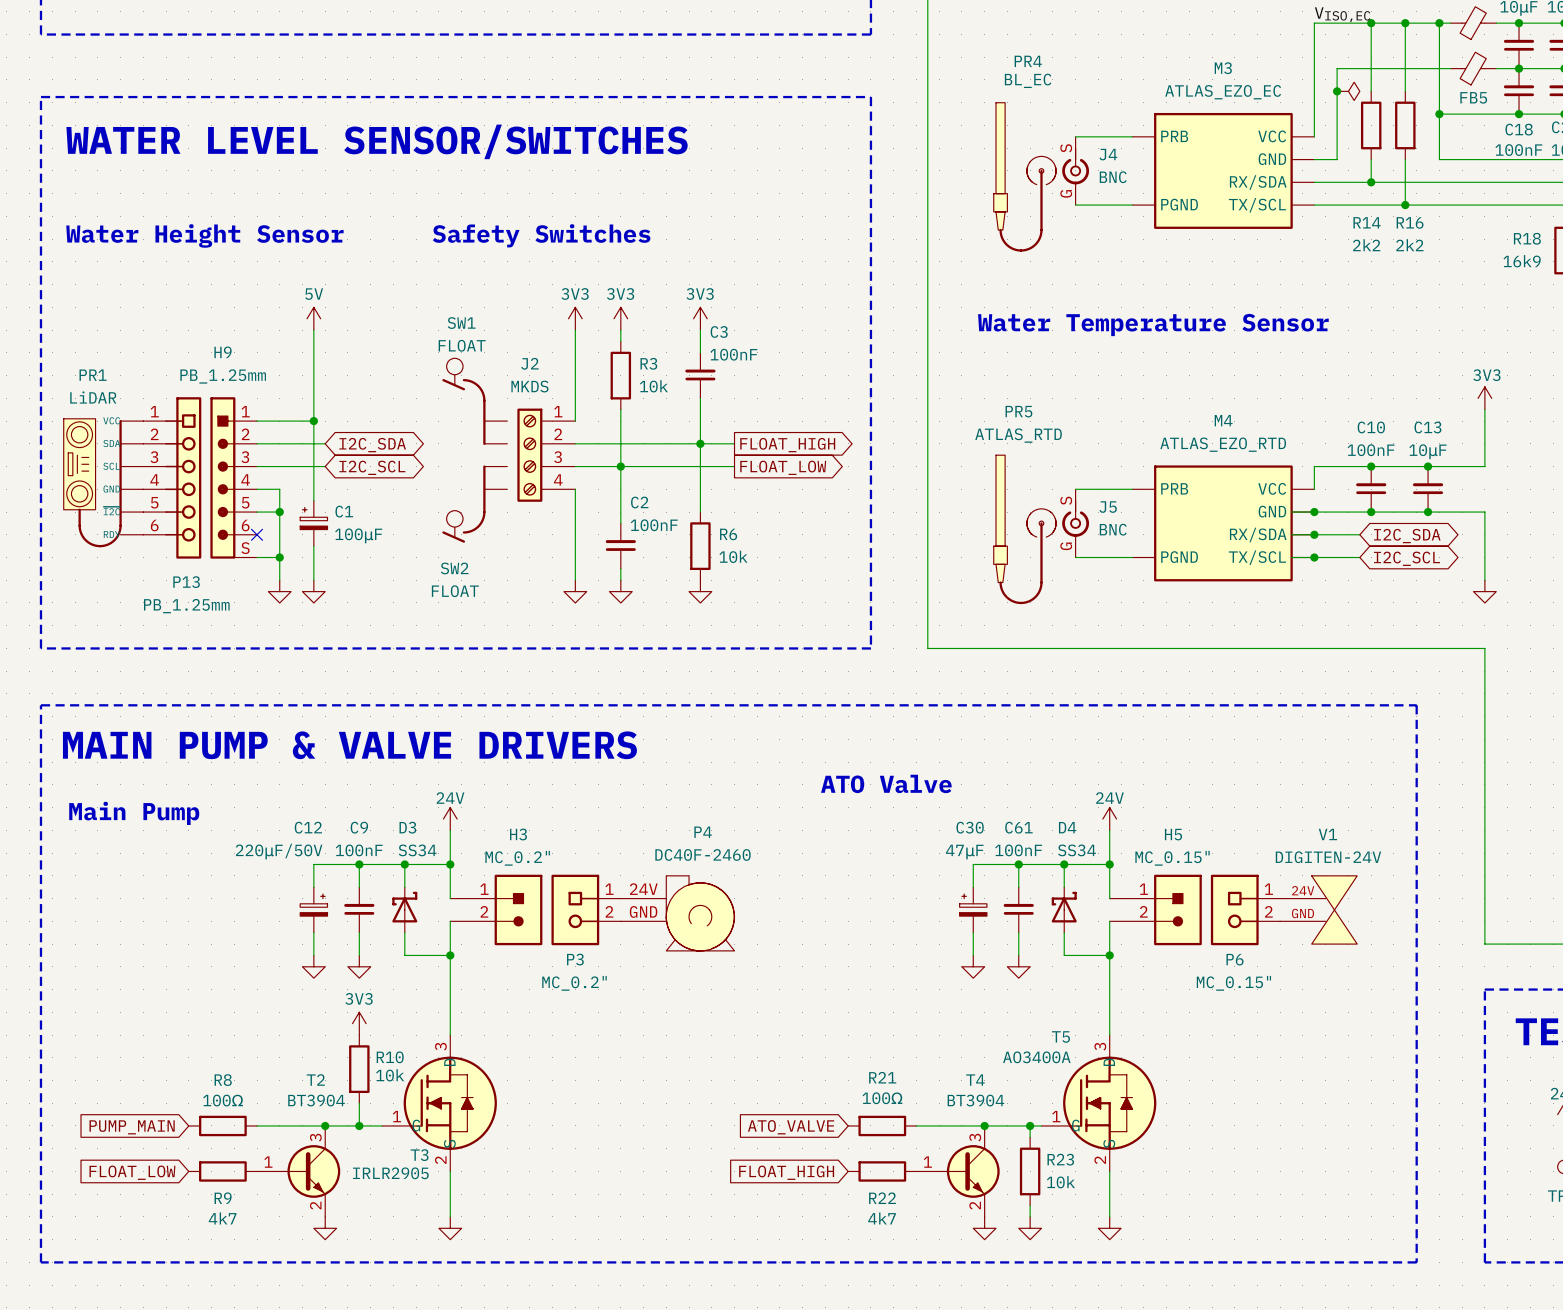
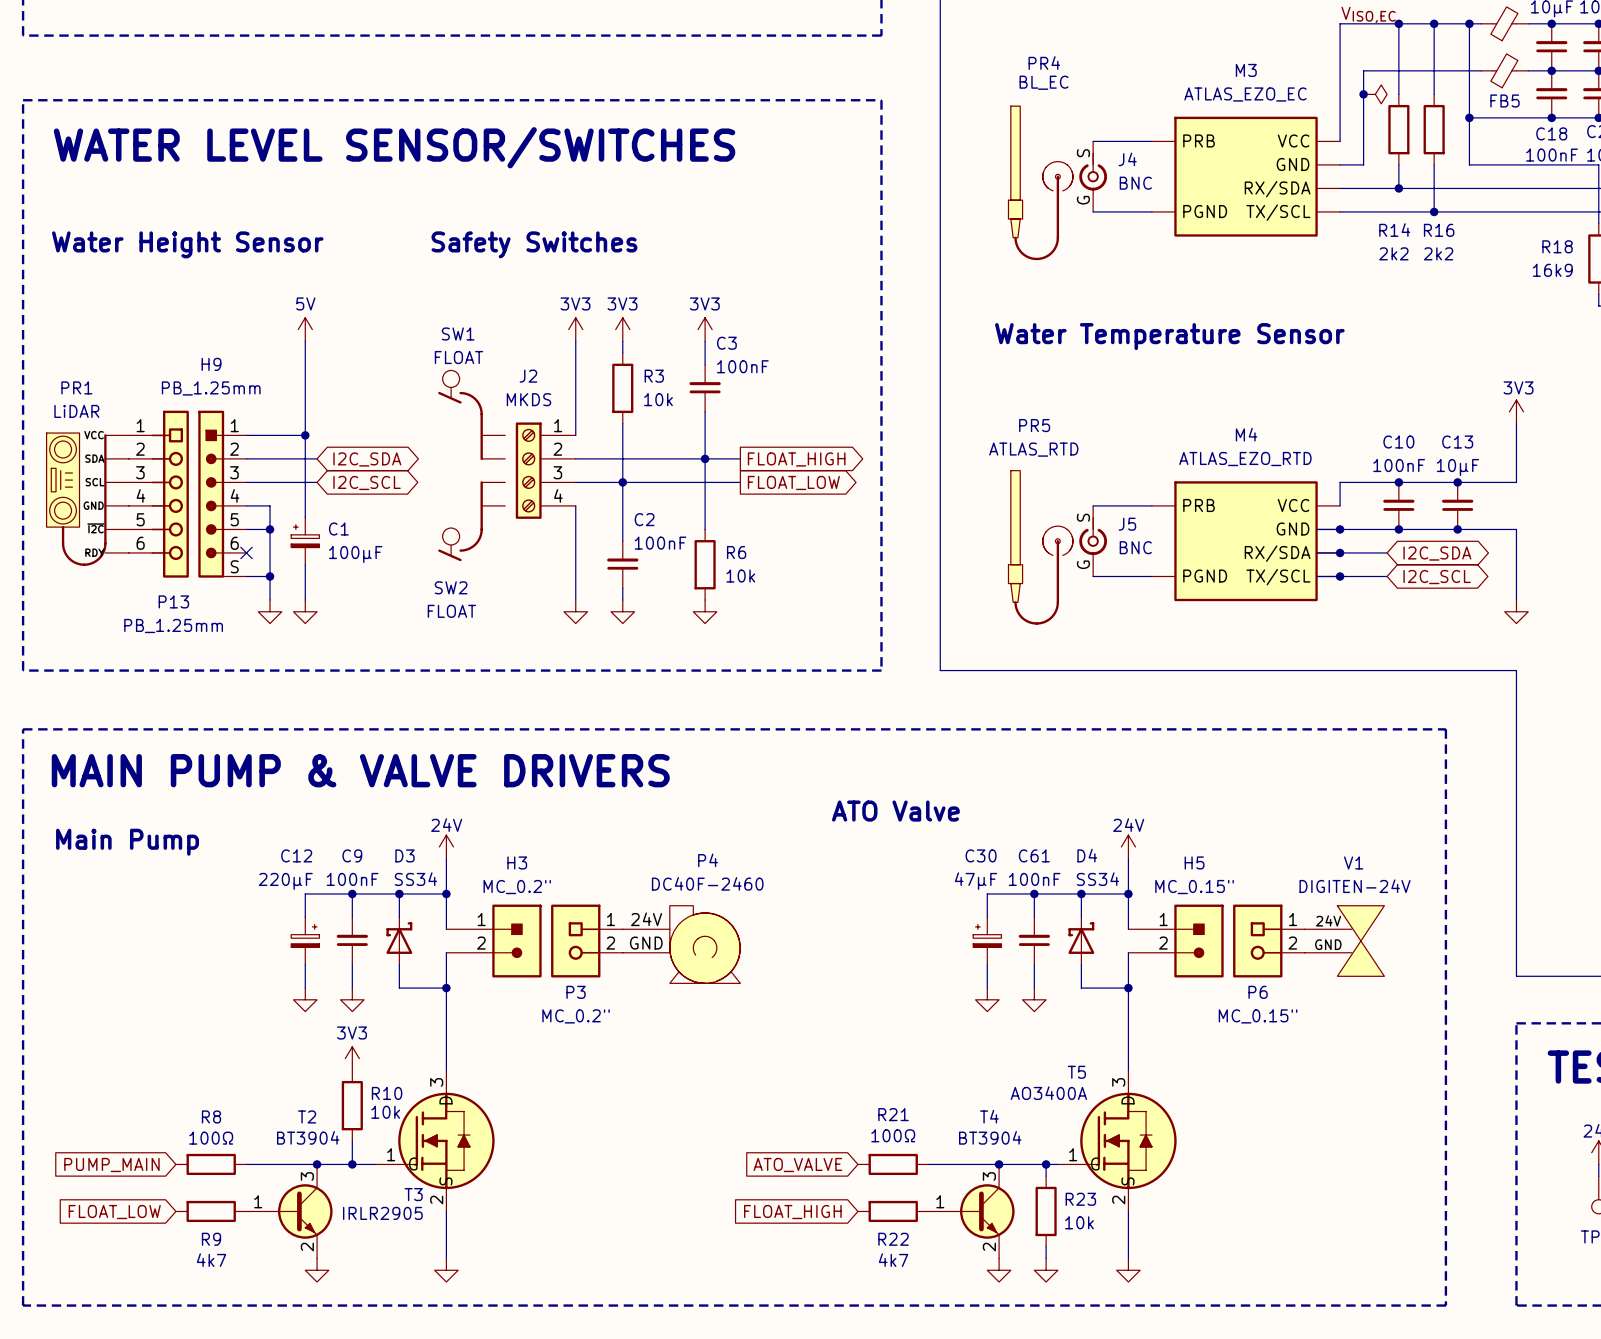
C12 value: 220μF/50V (279, 851) -> 220μF (285, 881)

